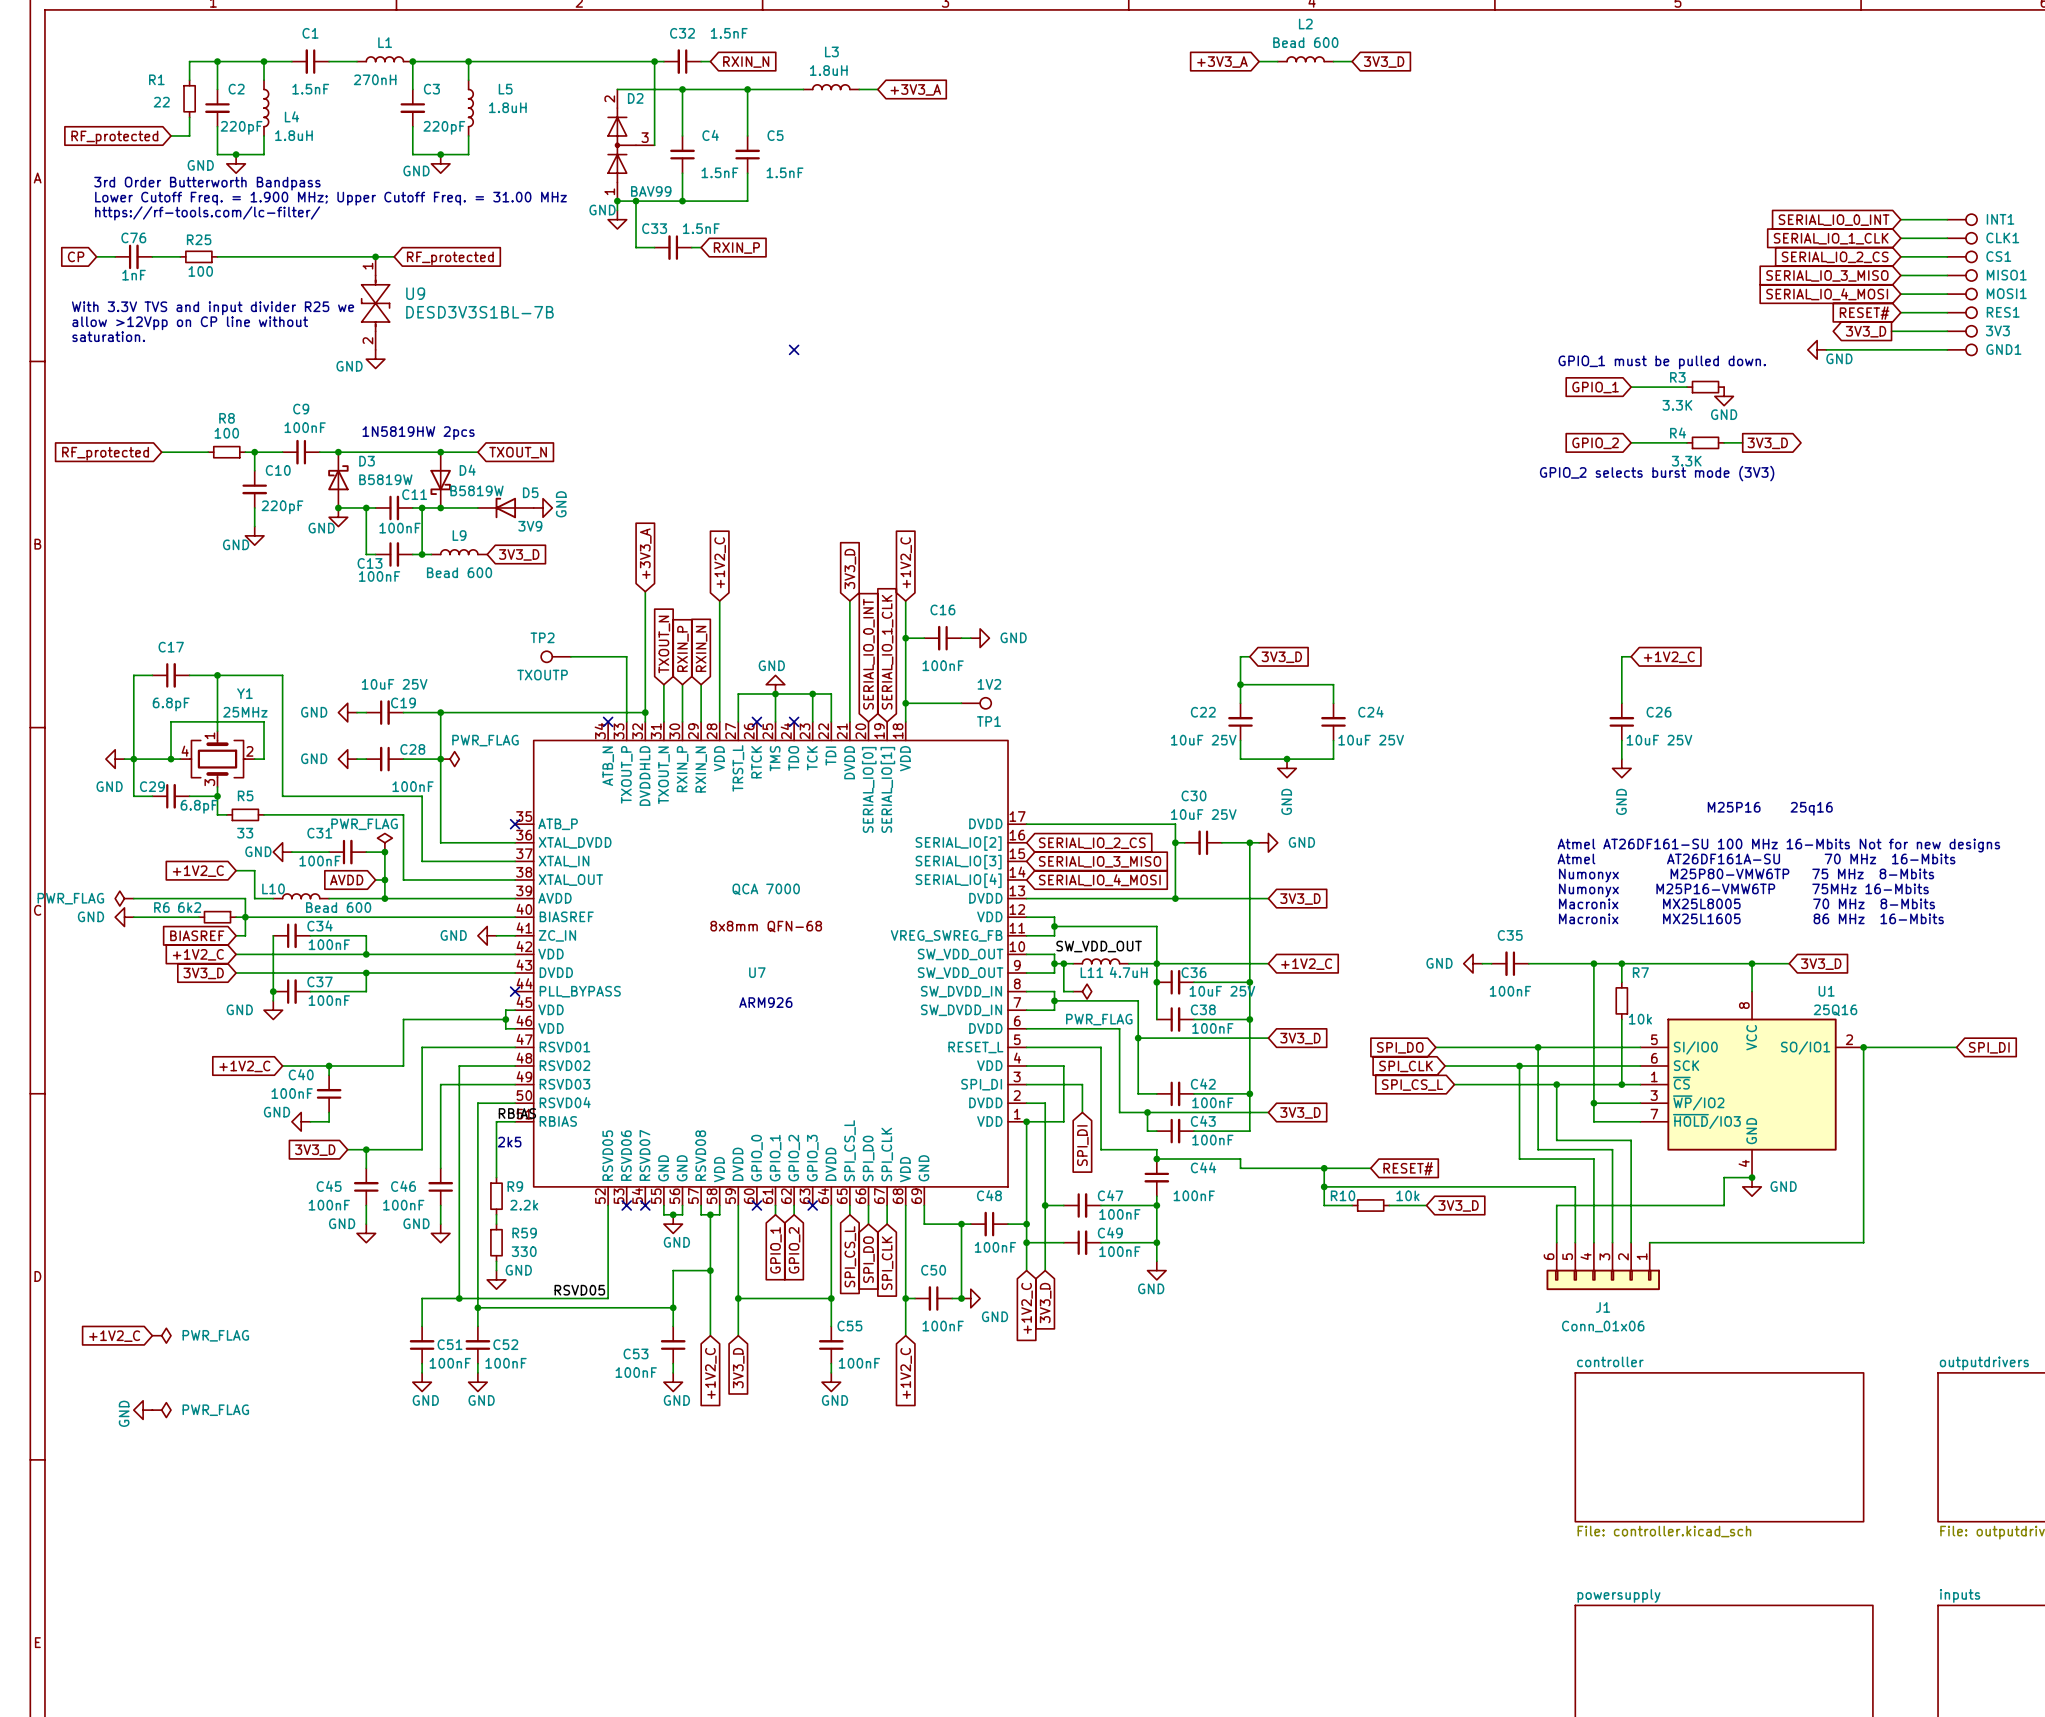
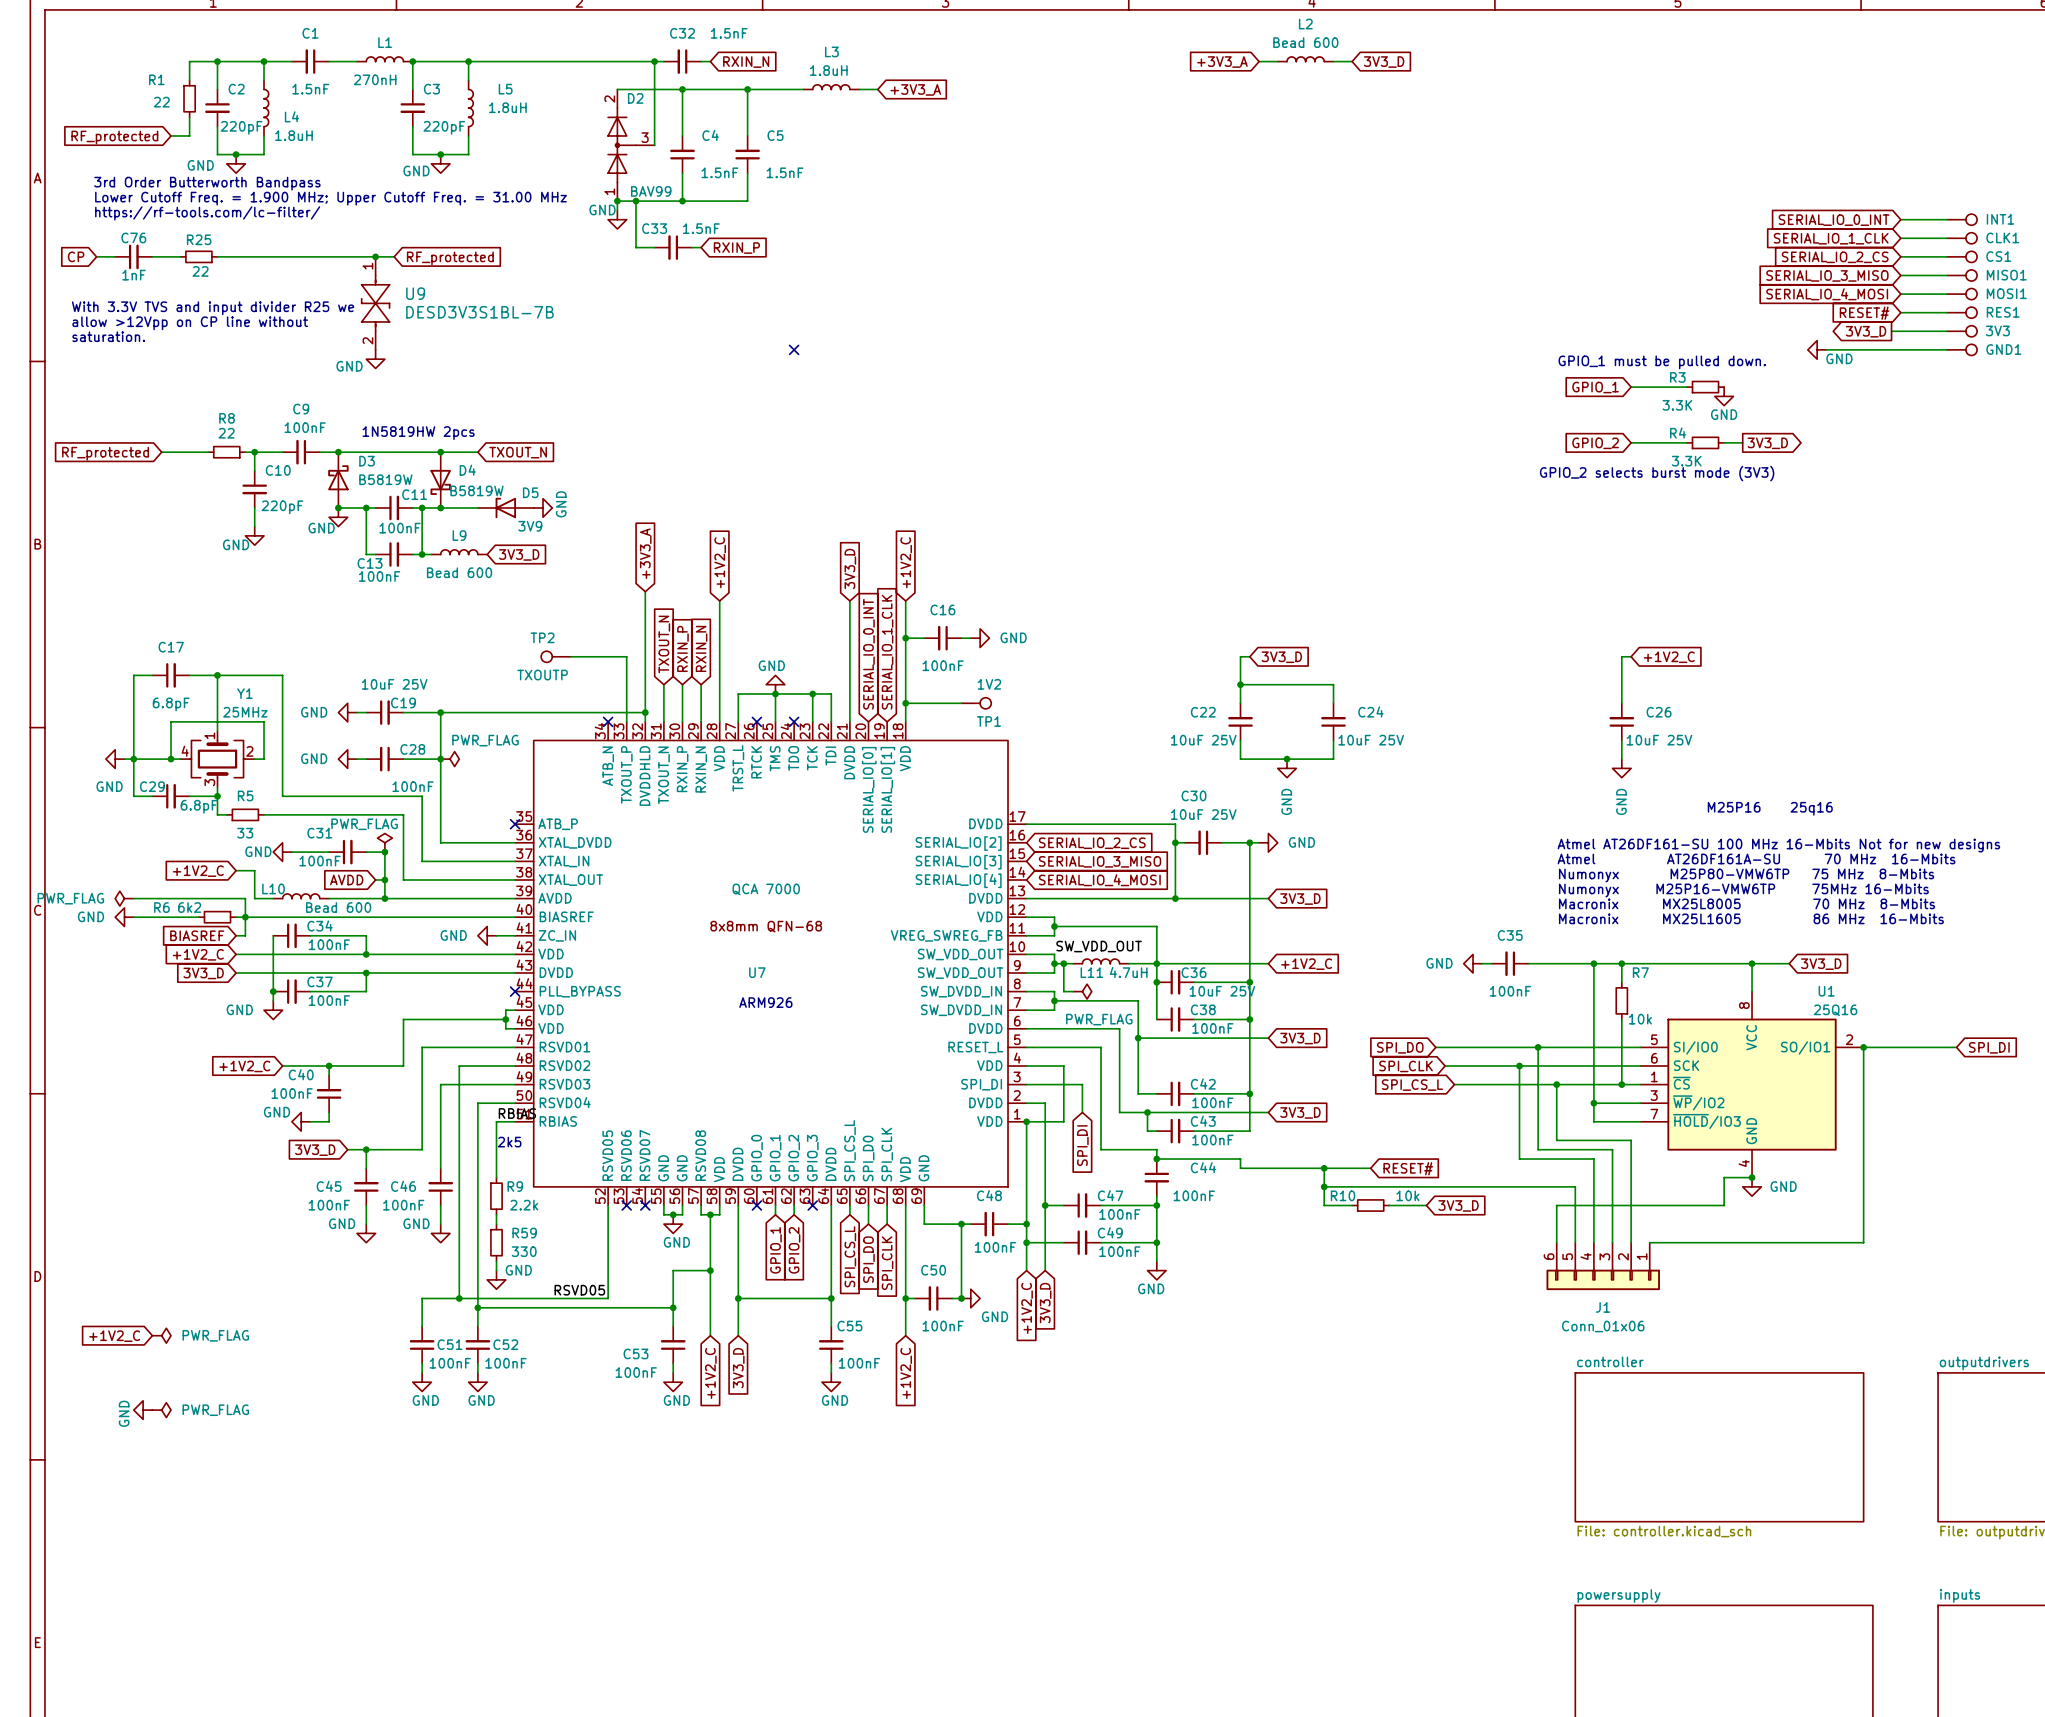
R25 value: 100 (200, 271) -> 22 (200, 271)
R8 value: 100 (226, 433) -> 22 (226, 433)

